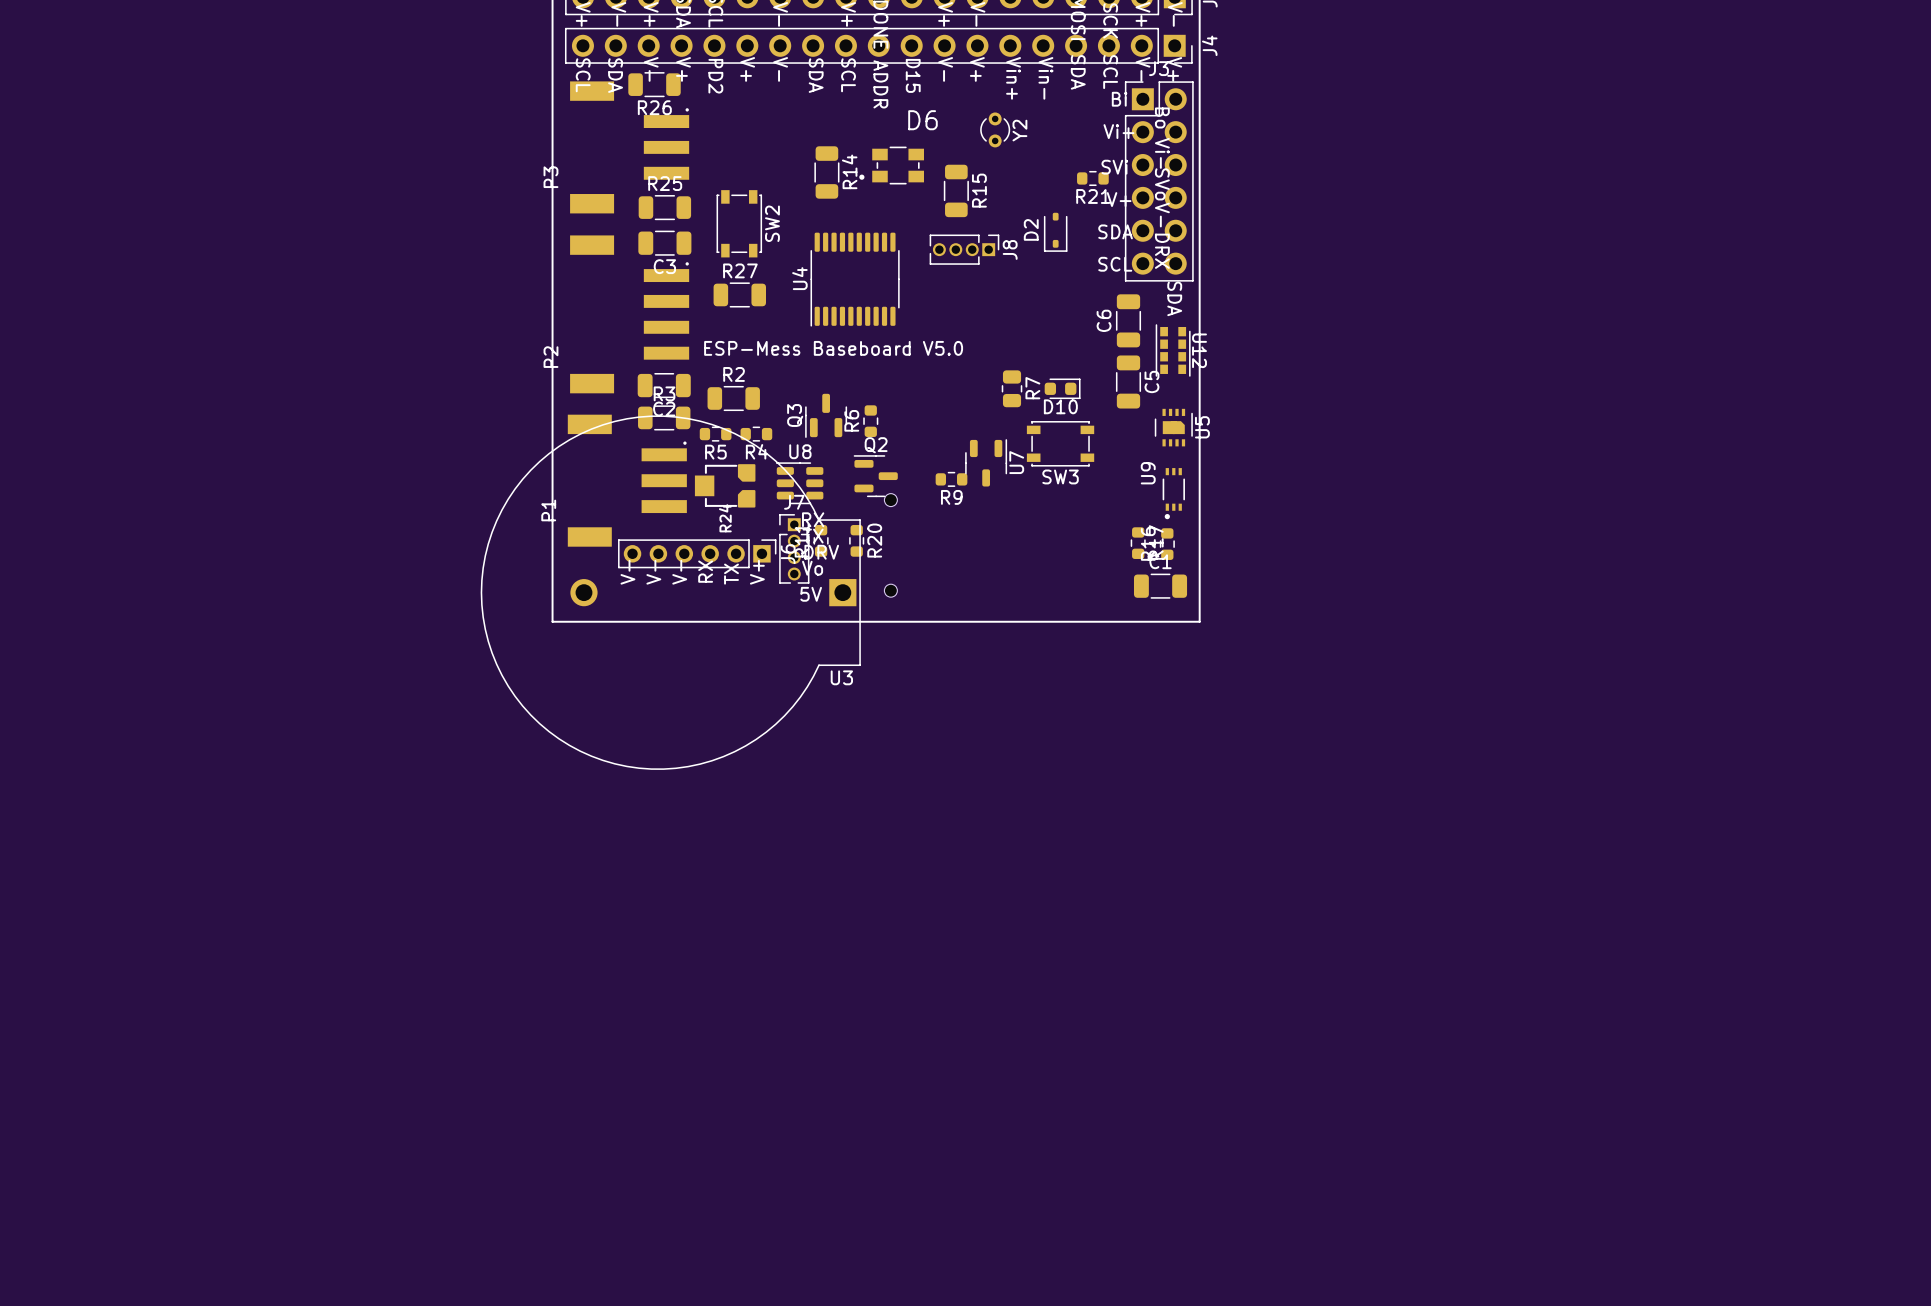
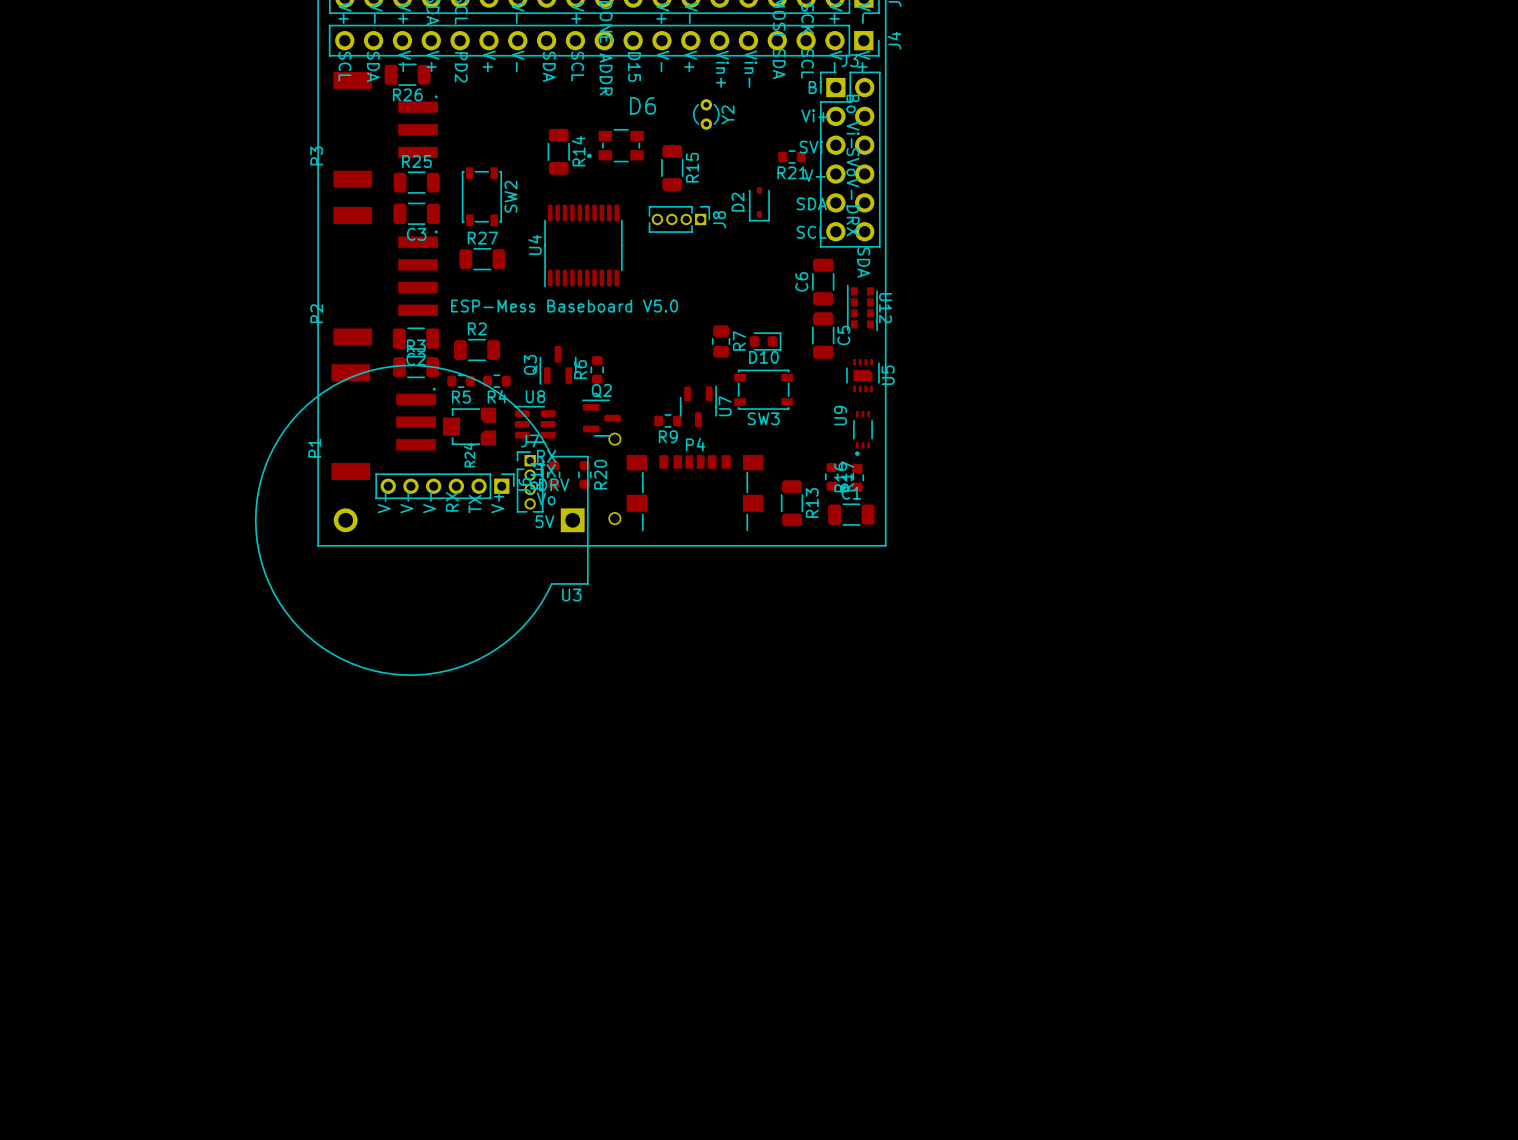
P4: none -> (695, 493)
R13: none -> (792, 503)

